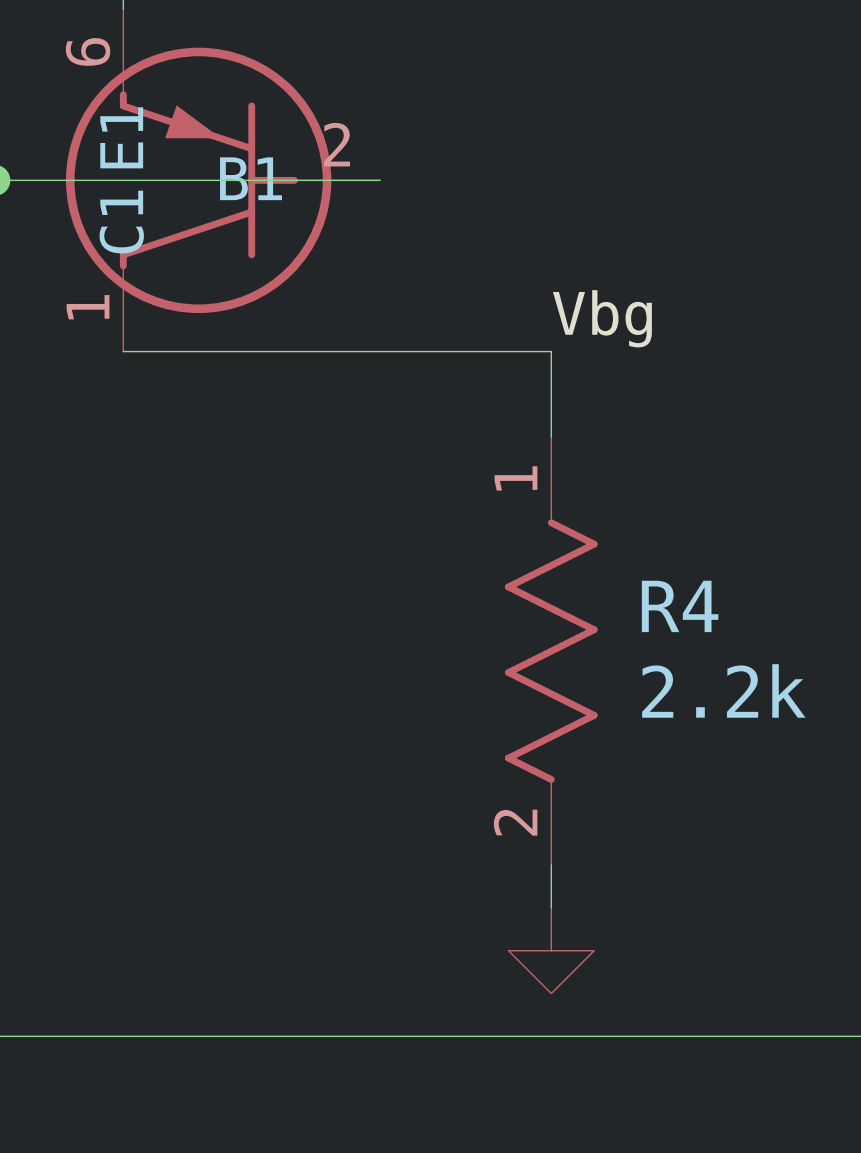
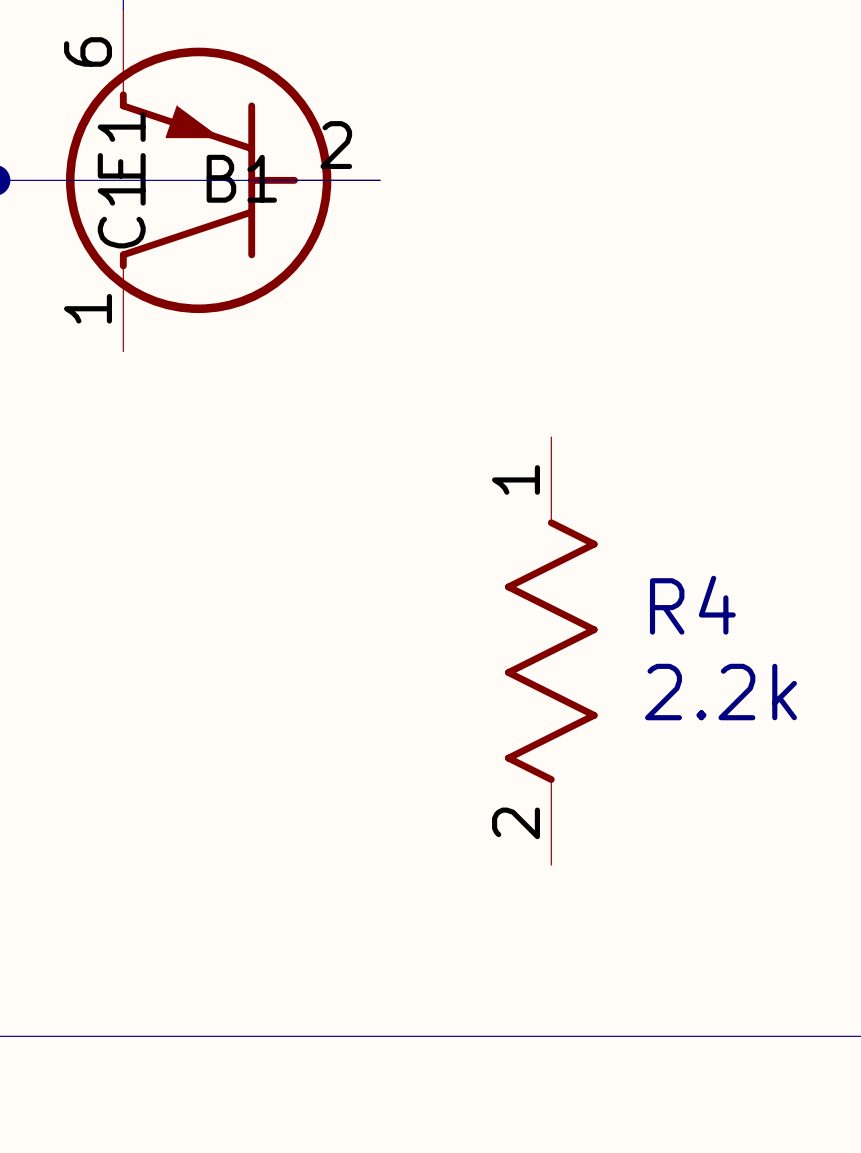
label: Vbg (602, 318) -> none
wire: (123, 351) (551, 351) (551, 437) -> none
wire: (551, 865) (551, 907) -> none
power symbol: (551, 950) -> none

